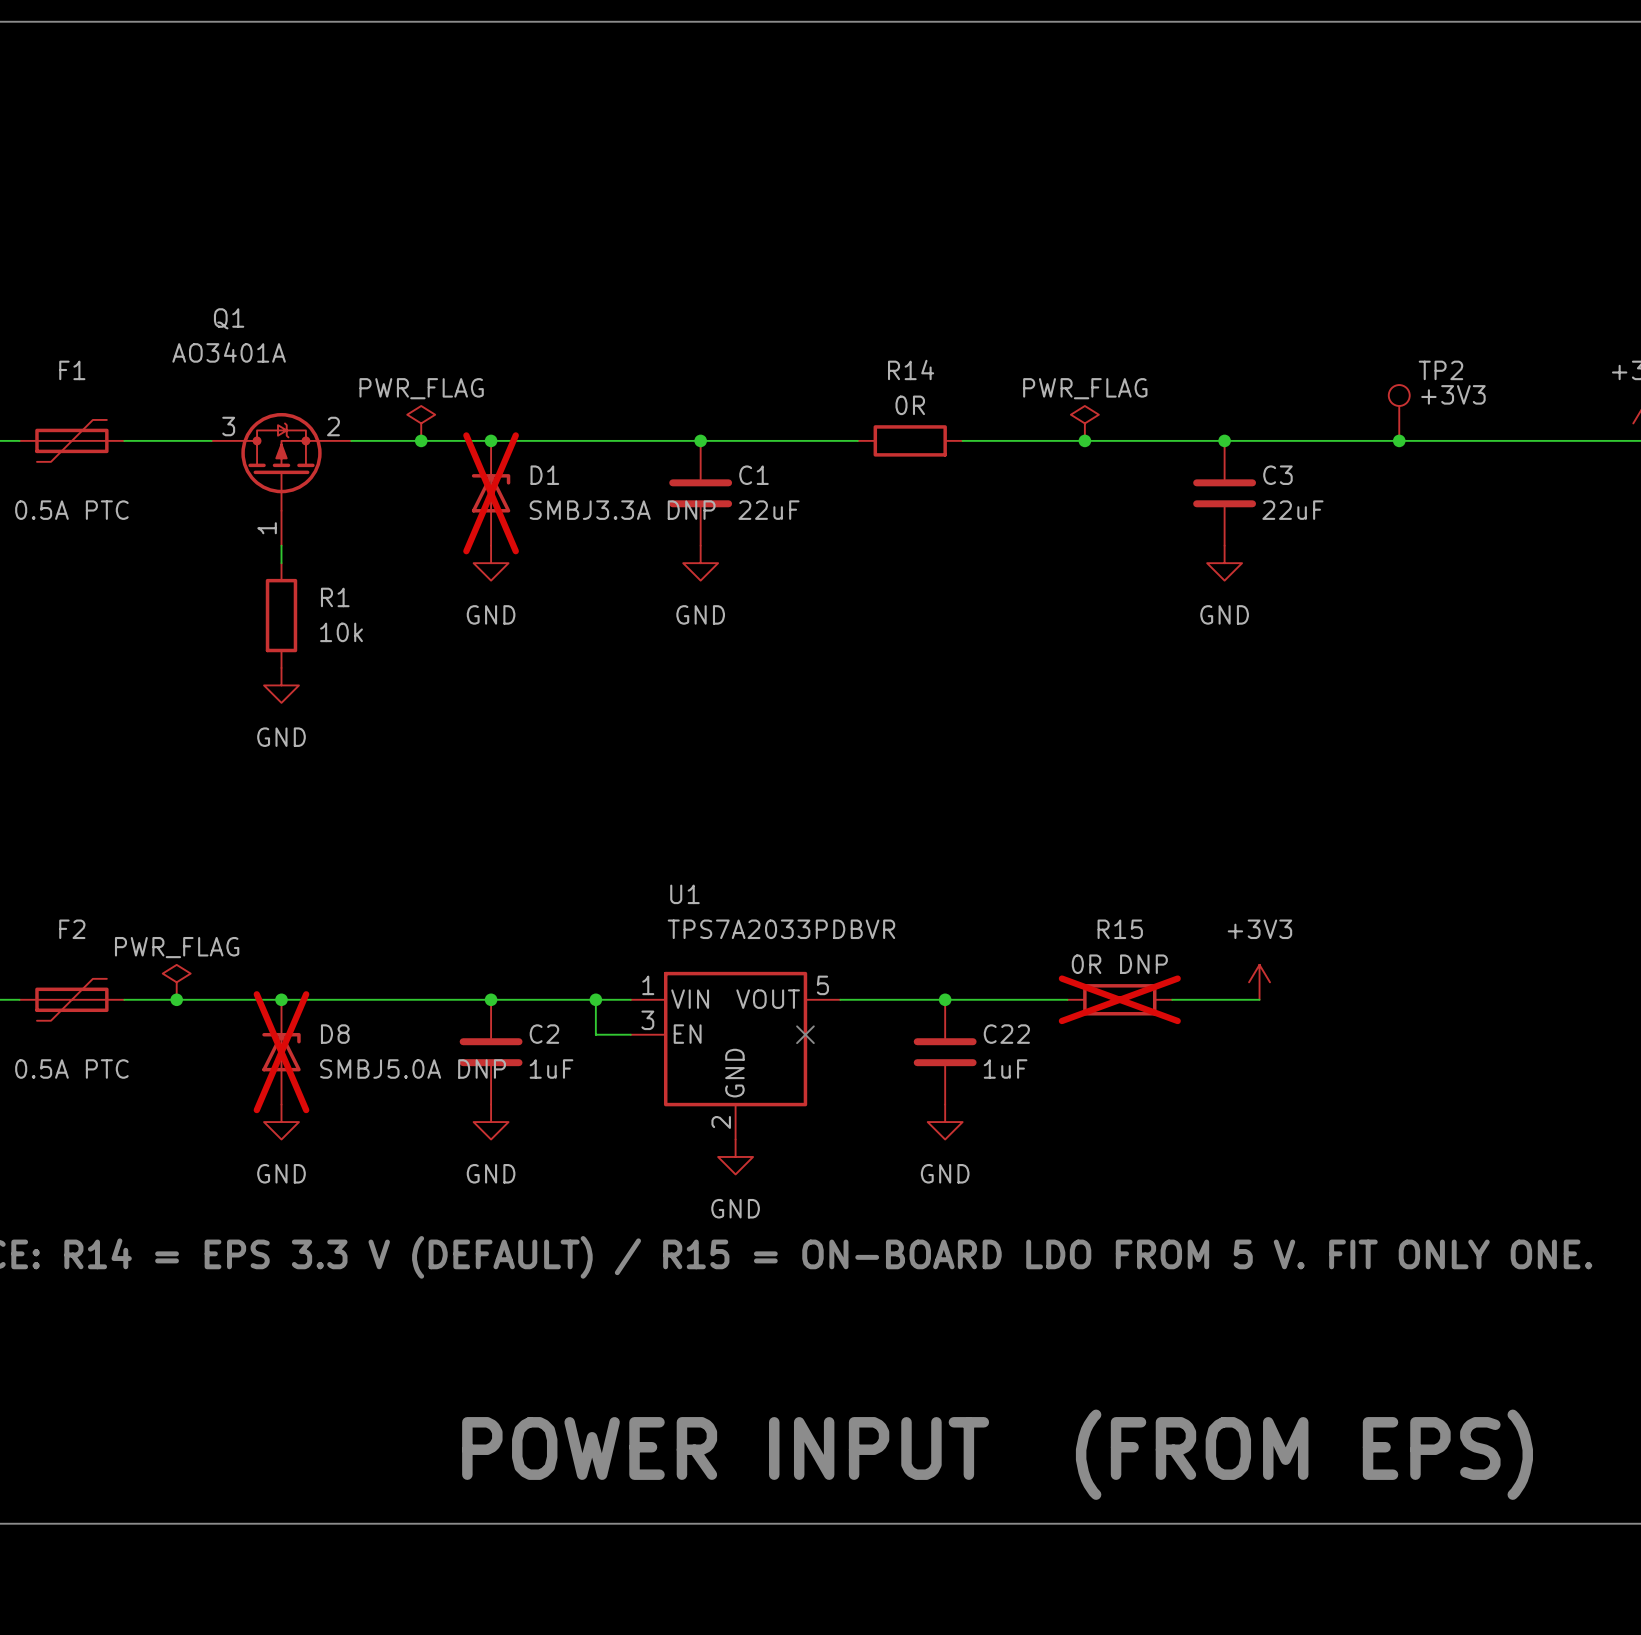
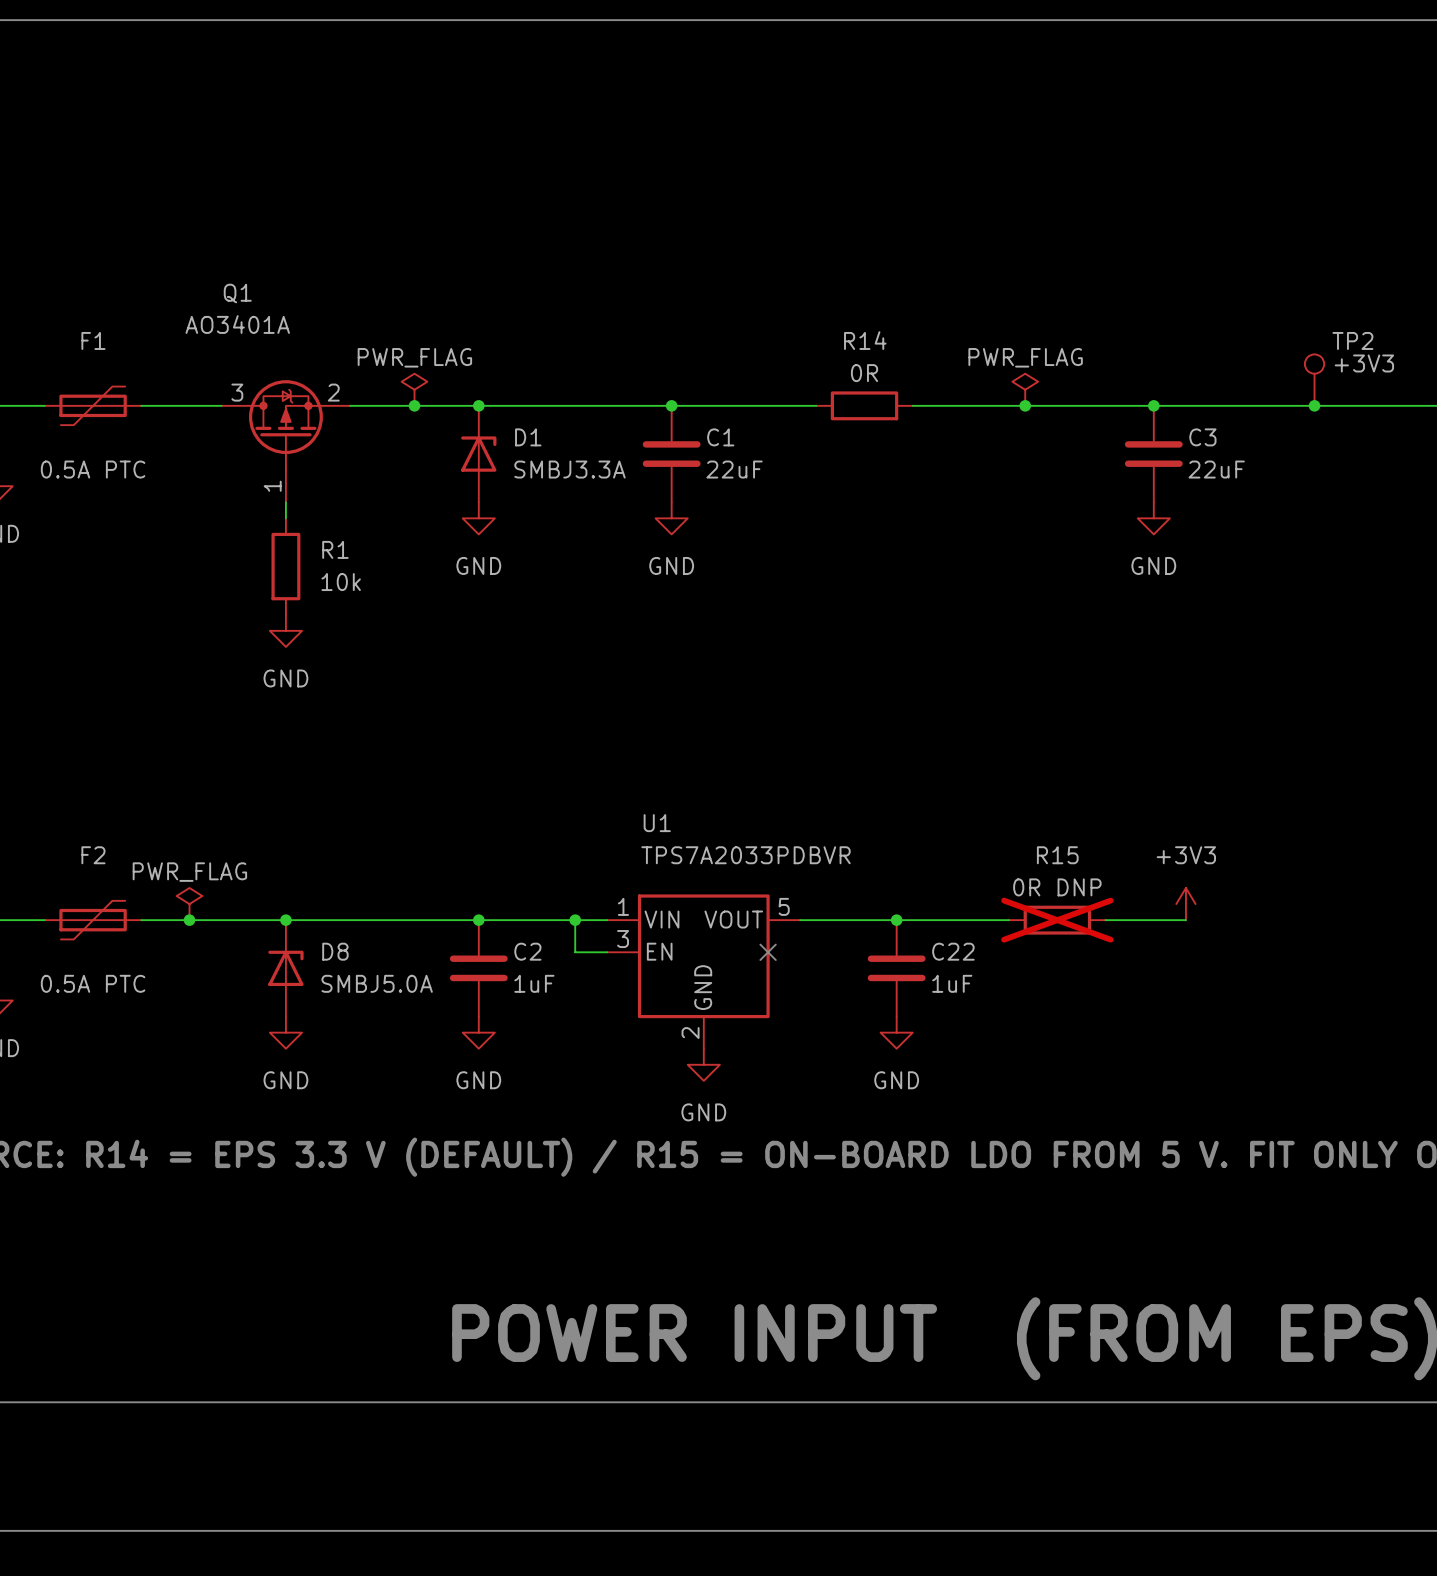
D1 do-not-place cross: (491, 493) -> none
D1 value: SMBJ3.3A DNP (622, 510) -> SMBJ3.3A (569, 469)
D8 do-not-place cross: (281, 1052) -> none
D8 value: SMBJ5.0A DNP (413, 1069) -> SMBJ5.0A (377, 983)

